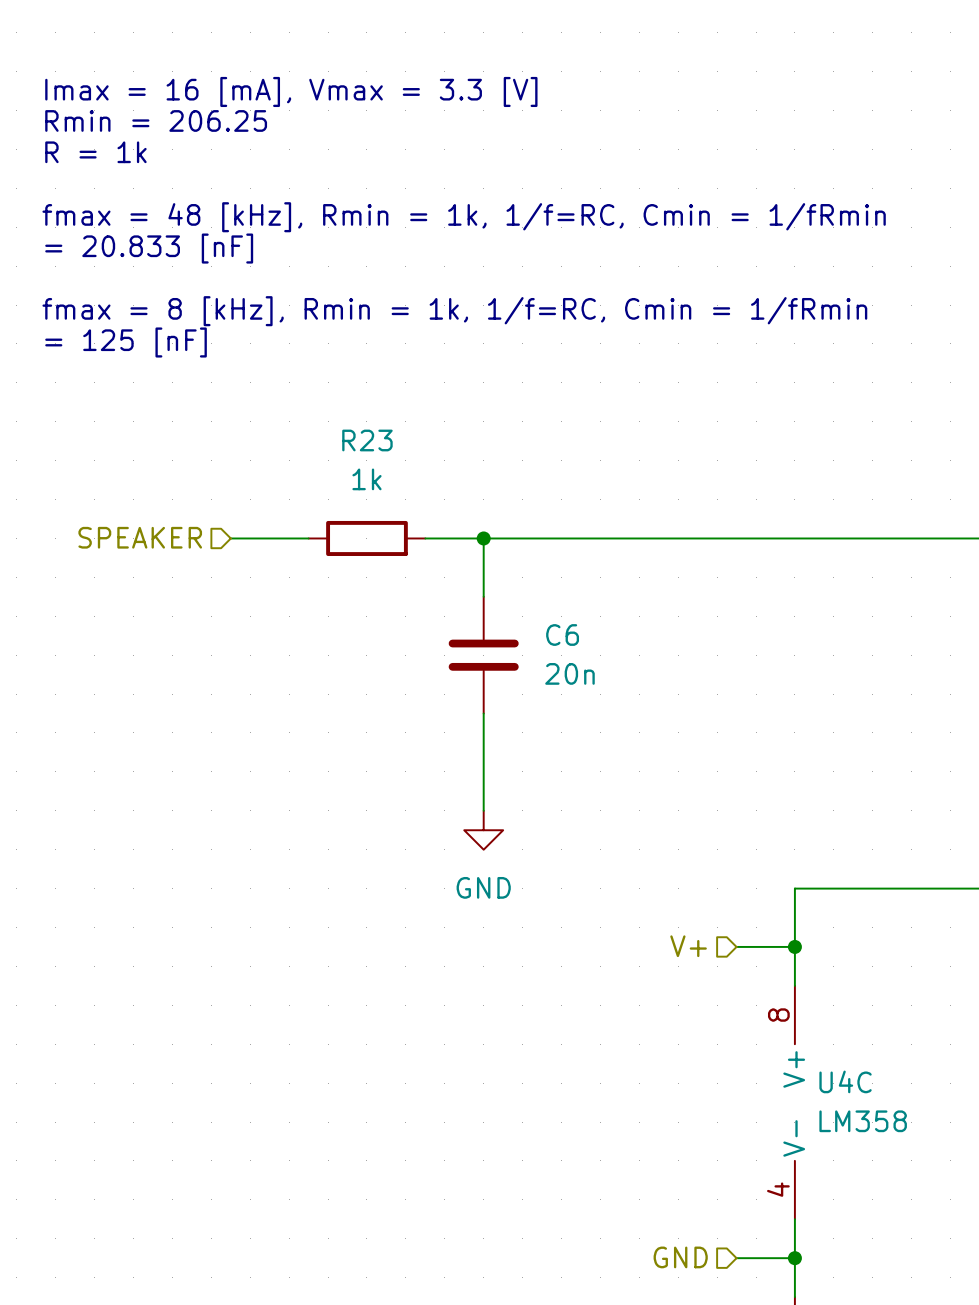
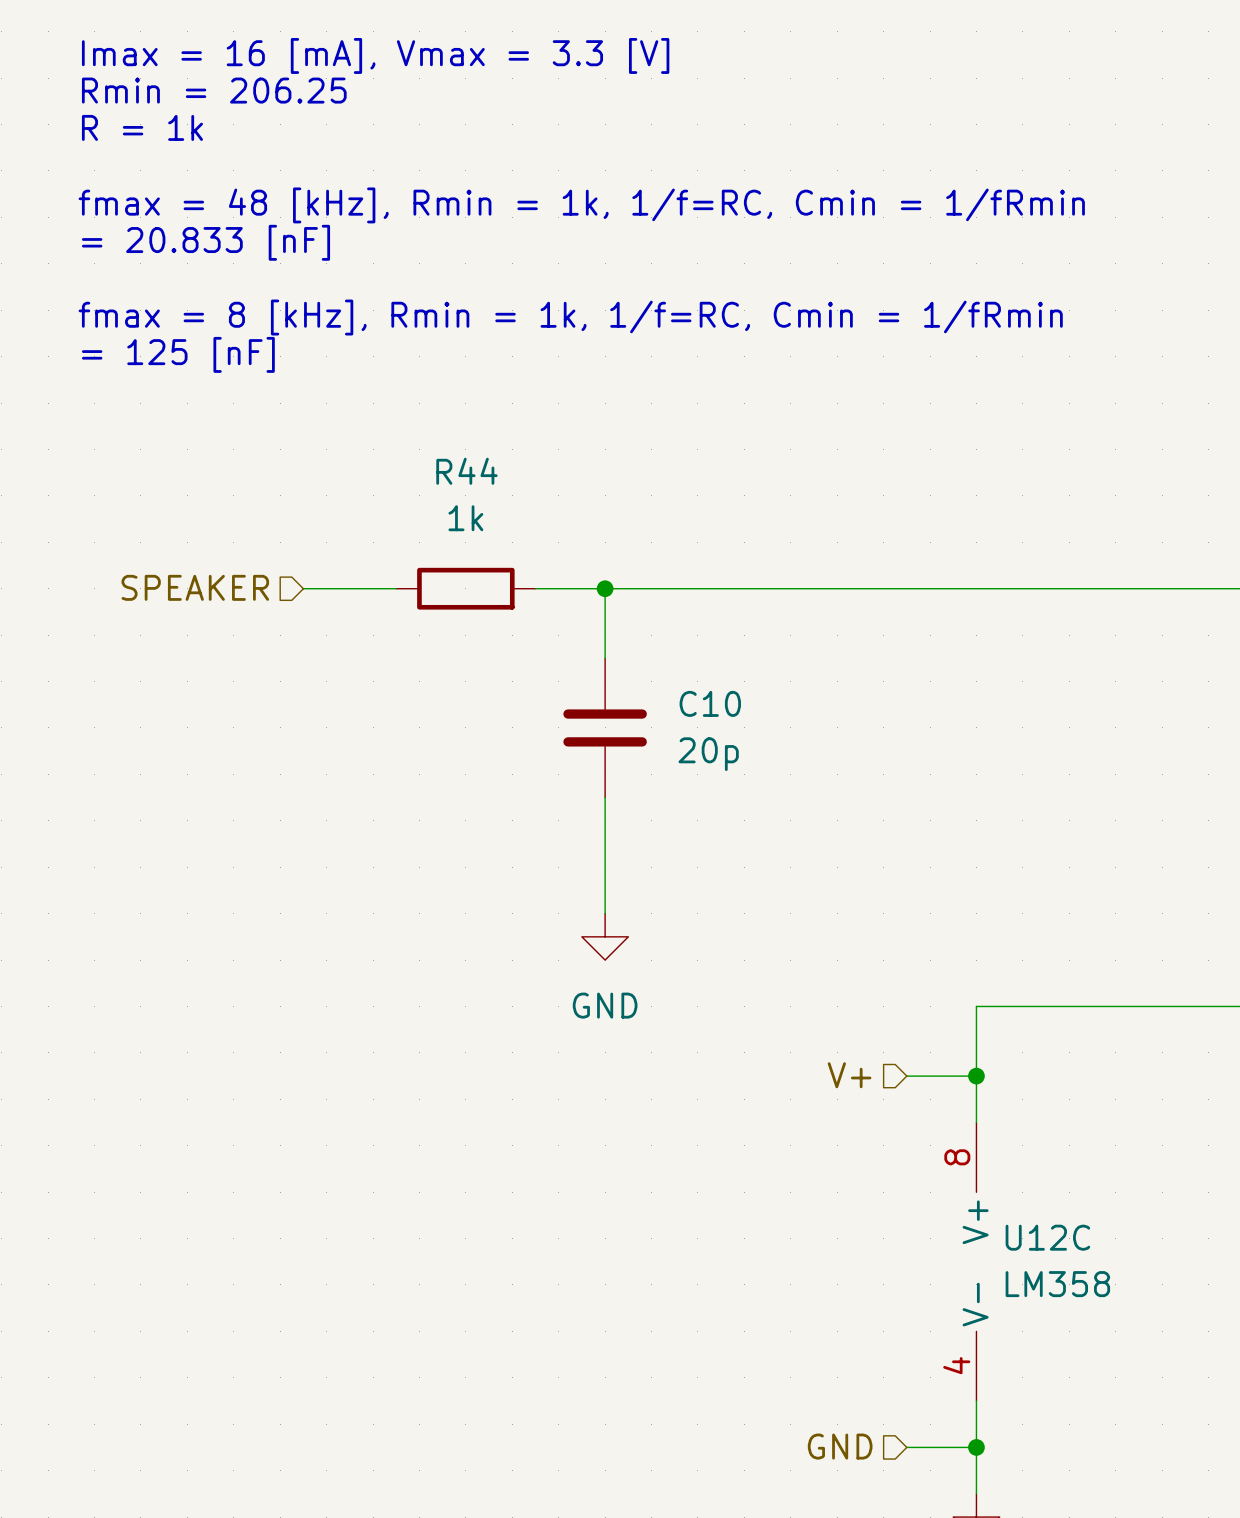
R23 name: R23 (367, 440) -> R44 (466, 471)
C6 name: C6 (562, 635) -> C10 (710, 703)
C6 value: 20n (569, 673) -> 20p (708, 754)
U4C name: U4C (845, 1081) -> U12C (1047, 1237)

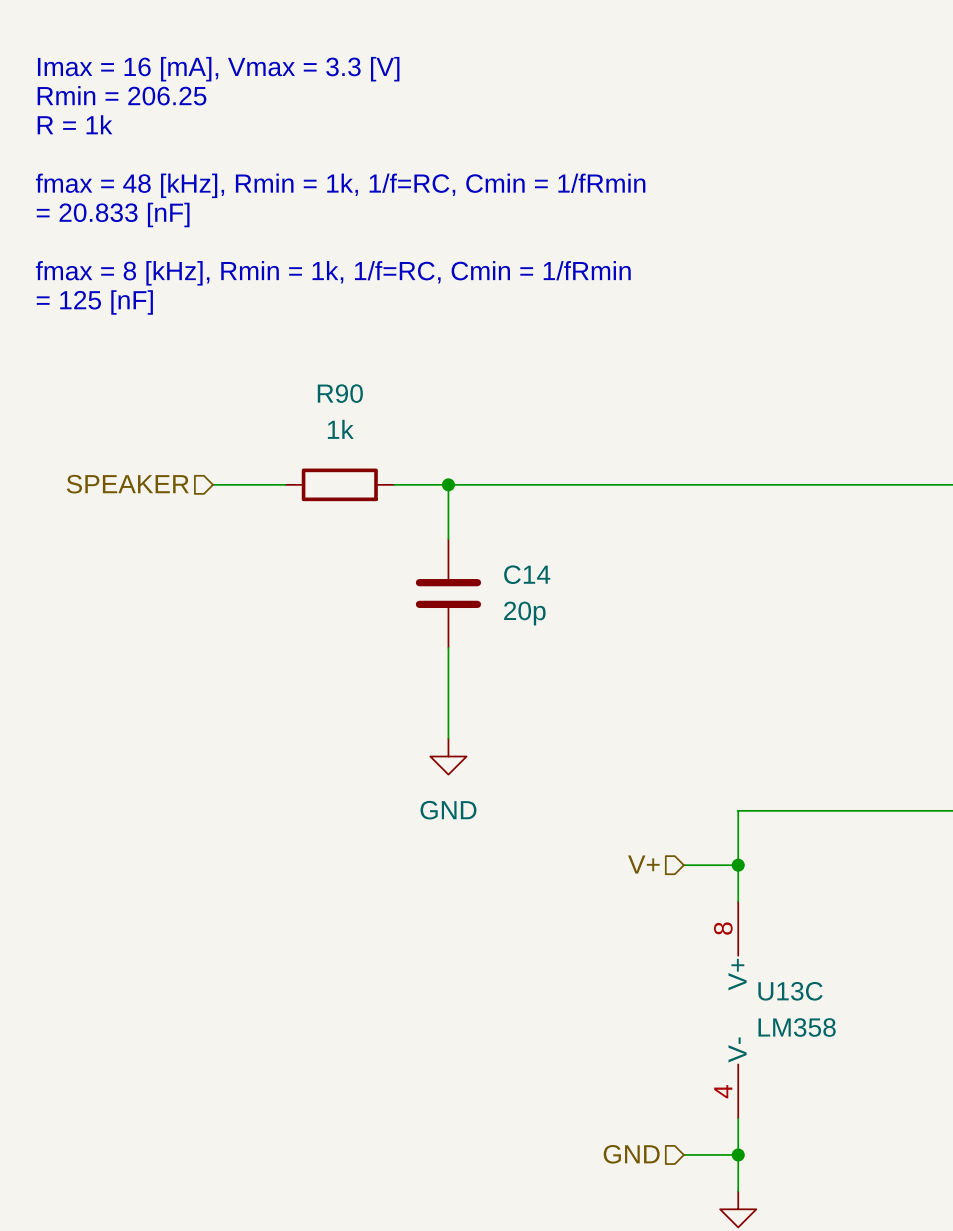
R44 name: R44 (466, 471) -> R90 (340, 393)
C10 name: C10 (710, 703) -> C14 (527, 574)
U12C name: U12C (1047, 1237) -> U13C (790, 991)

